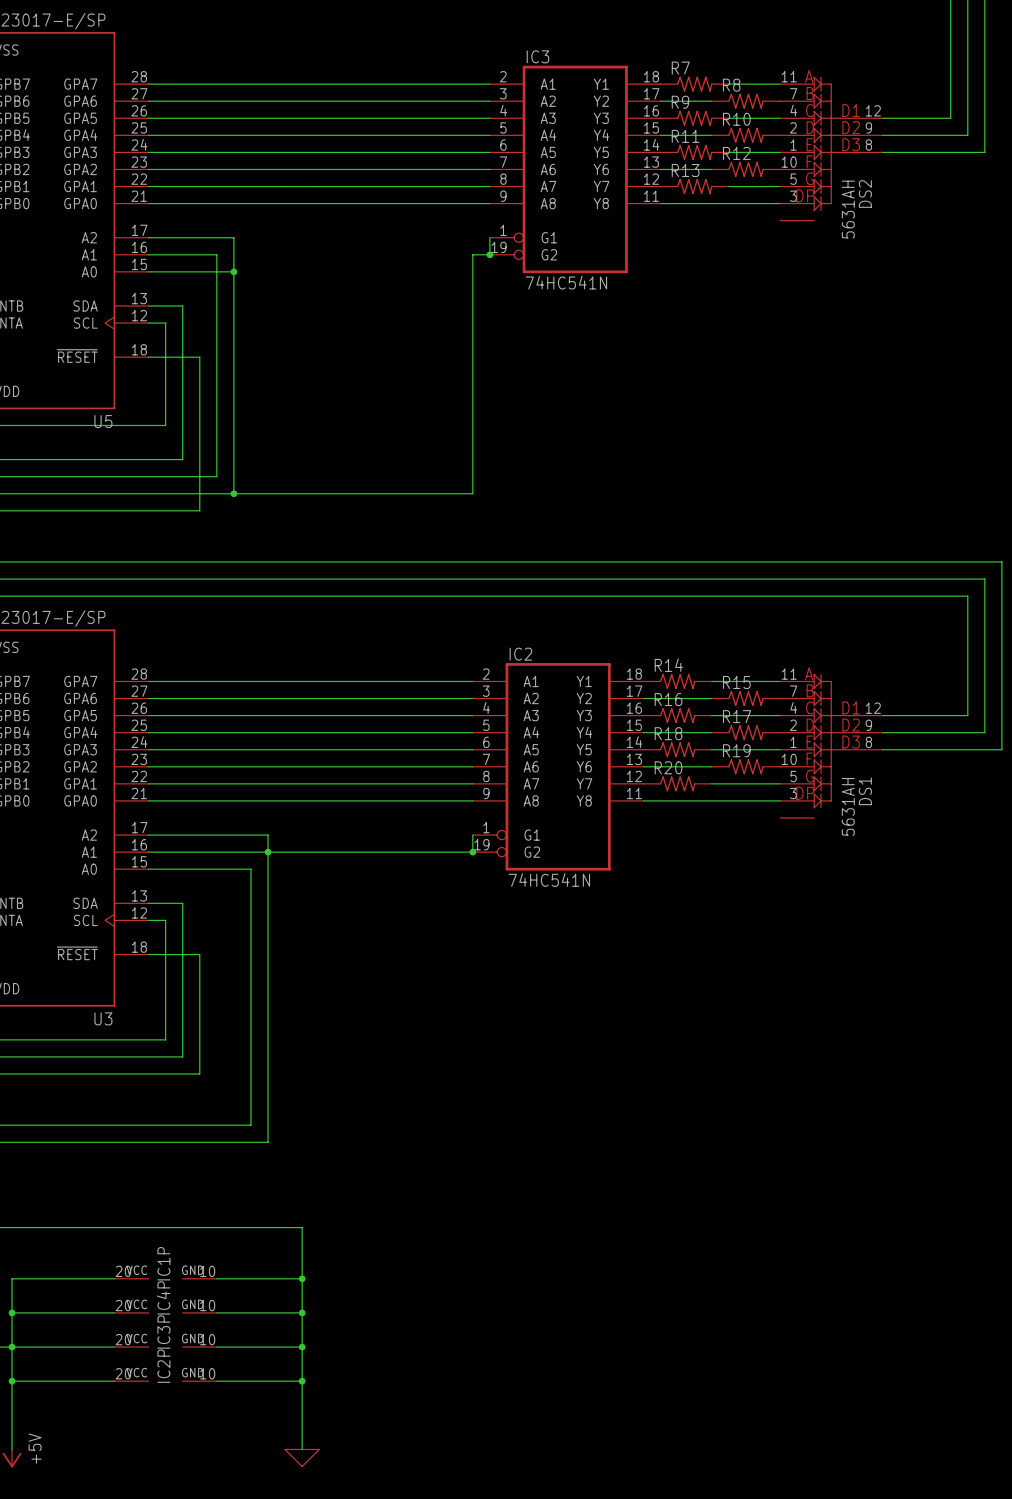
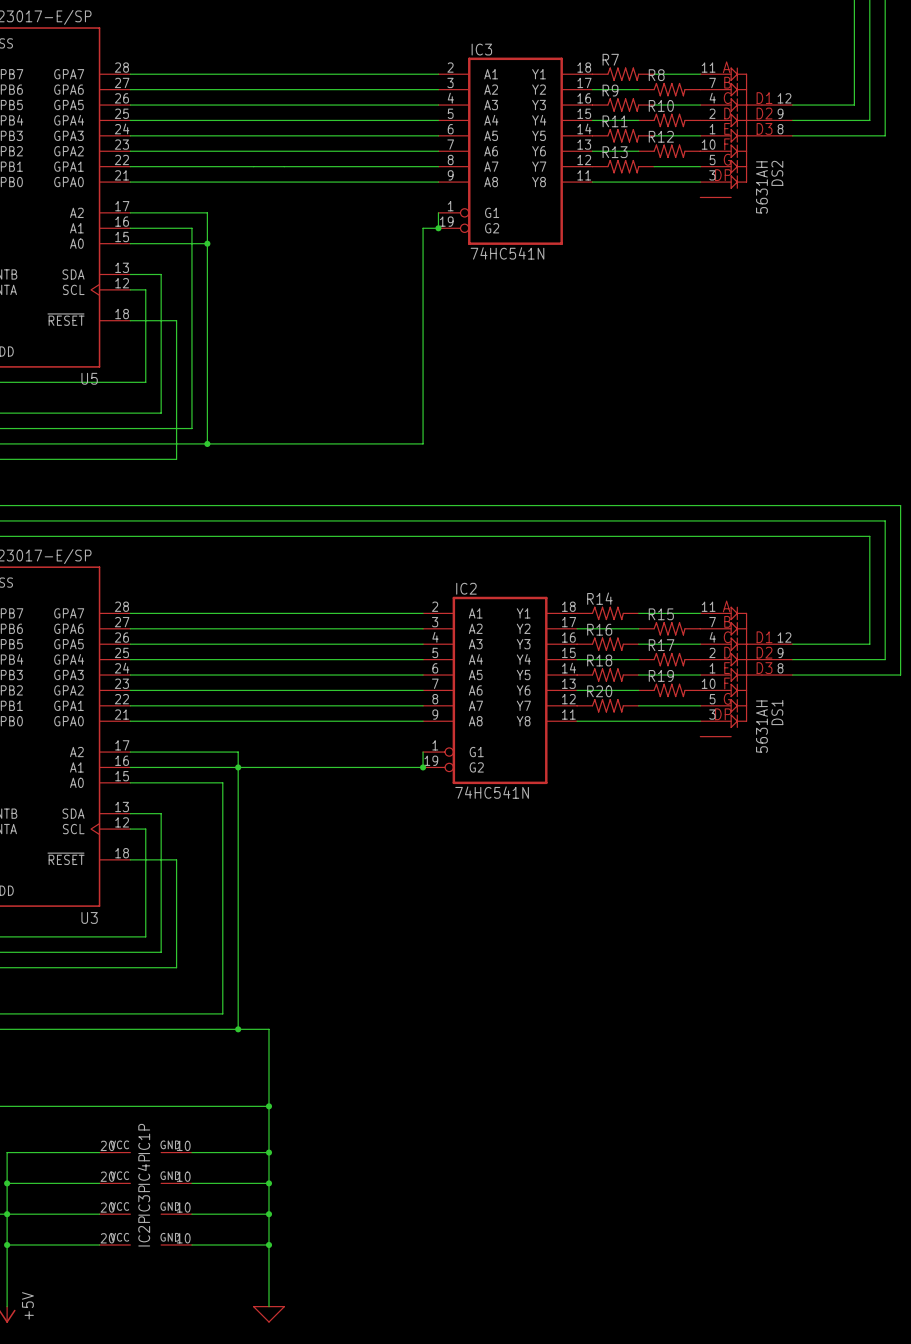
wire: none -> (238, 1029) (269, 1029) (269, 1106)
junction: none -> (238, 1029)
junction: none -> (269, 1106)

